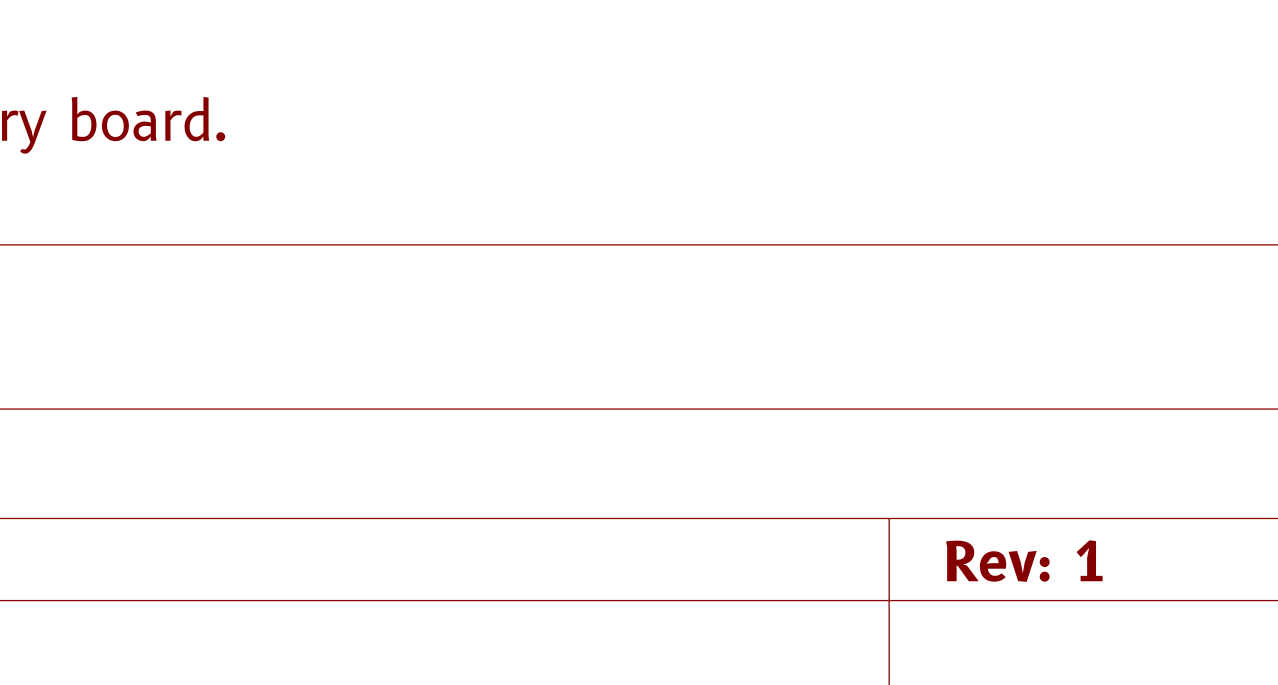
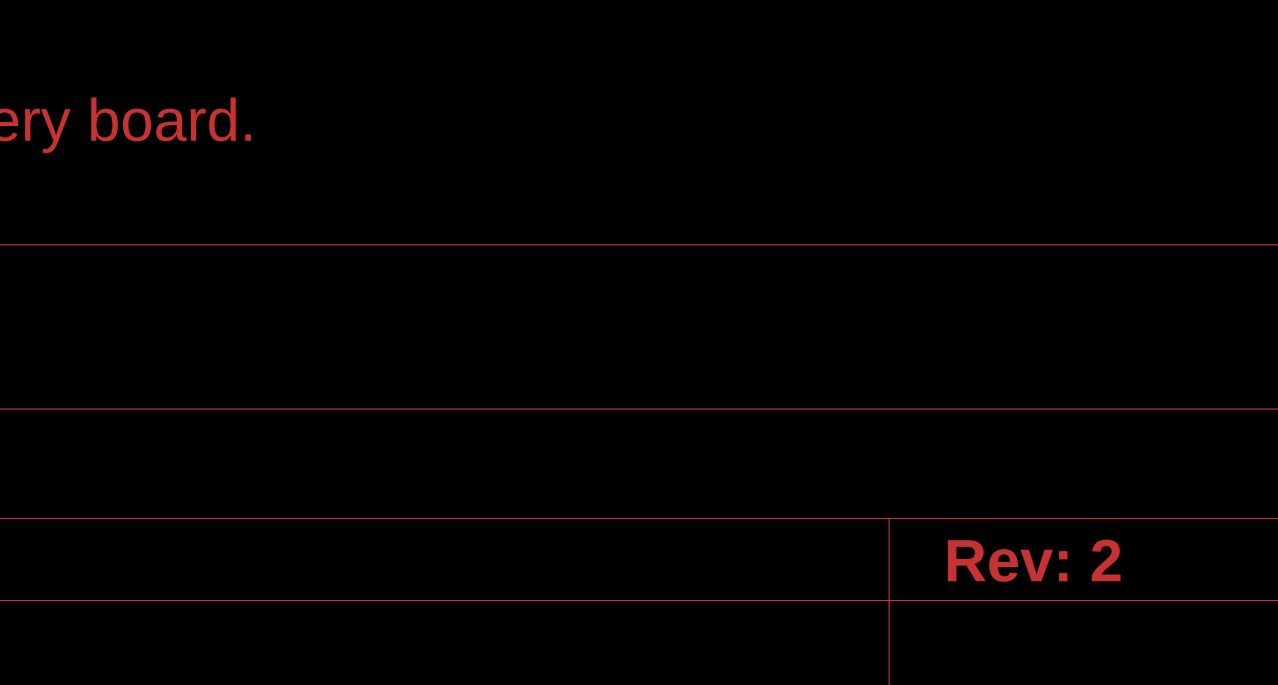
title block: Rev: 1 (1024, 561) -> Rev: 2 (1034, 560)

